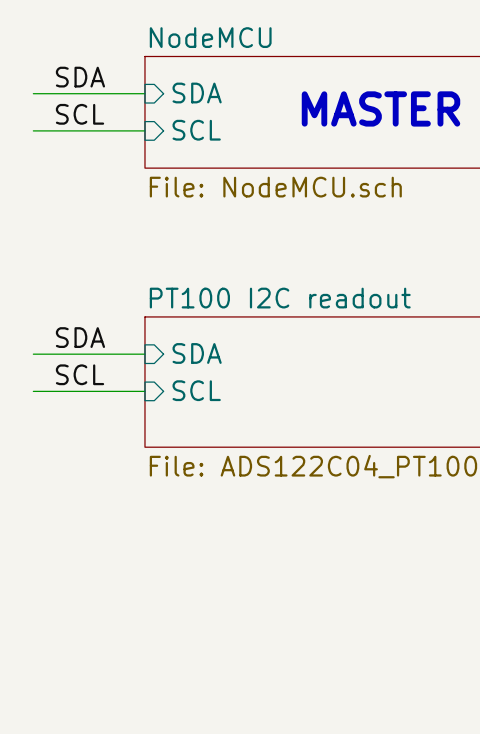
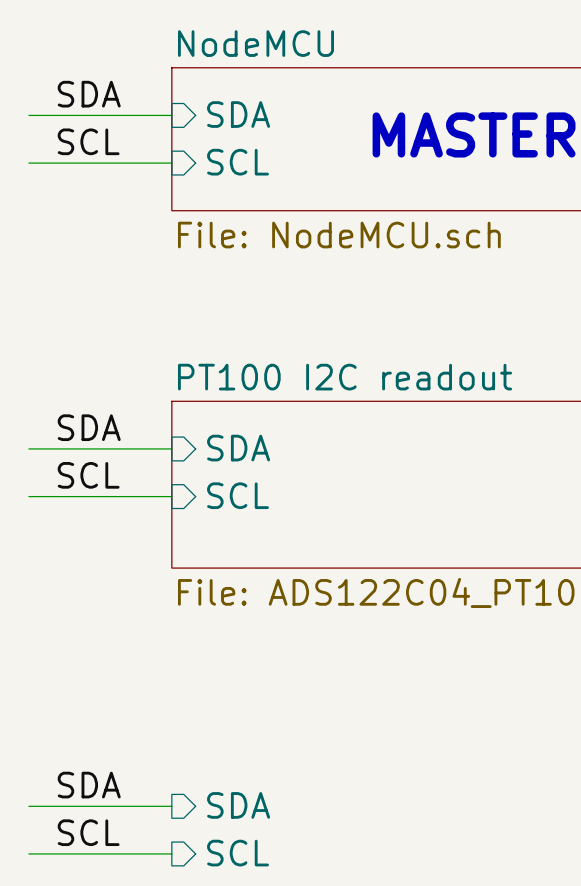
label: none -> SDA (89, 785)
sheet pin: none -> SDA (238, 805)
wire: none -> (28, 806) (171, 806)
label: none -> SCL (88, 832)
sheet pin: none -> SCL (238, 853)
wire: none -> (28, 853) (171, 853)

